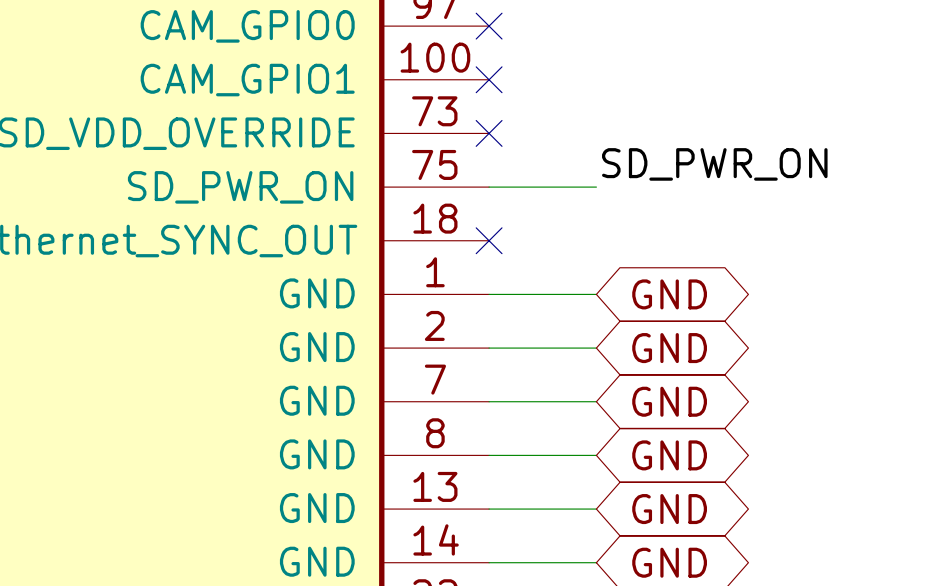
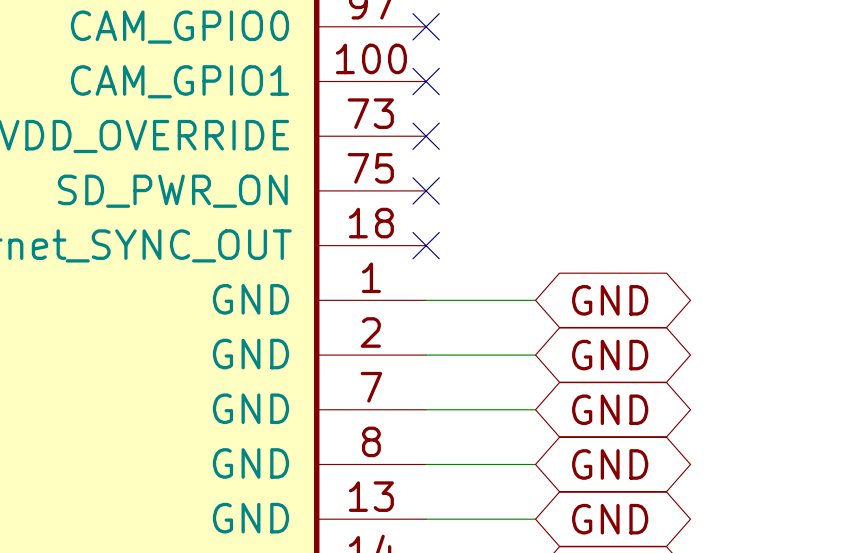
label: SD_PWR_ON (714, 164) -> none
wire: (489, 187) (596, 187) -> none
no-connect mark: none -> (426, 190)

